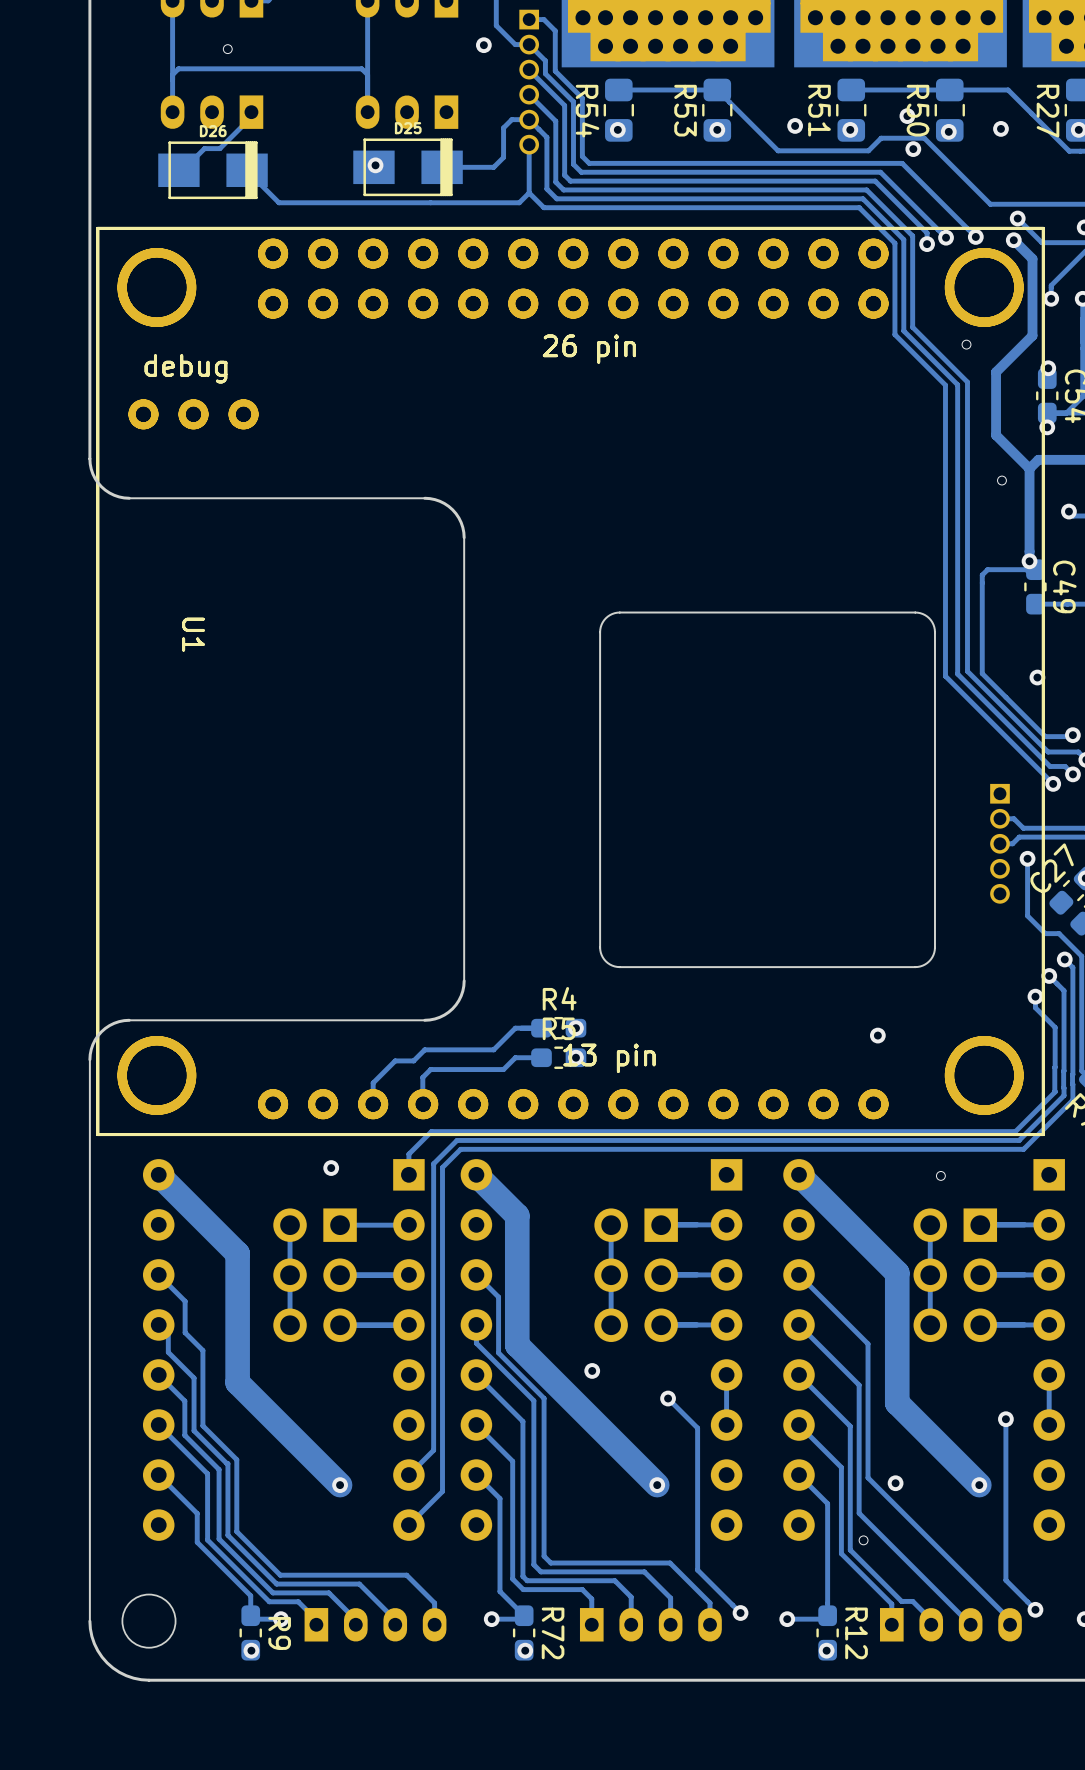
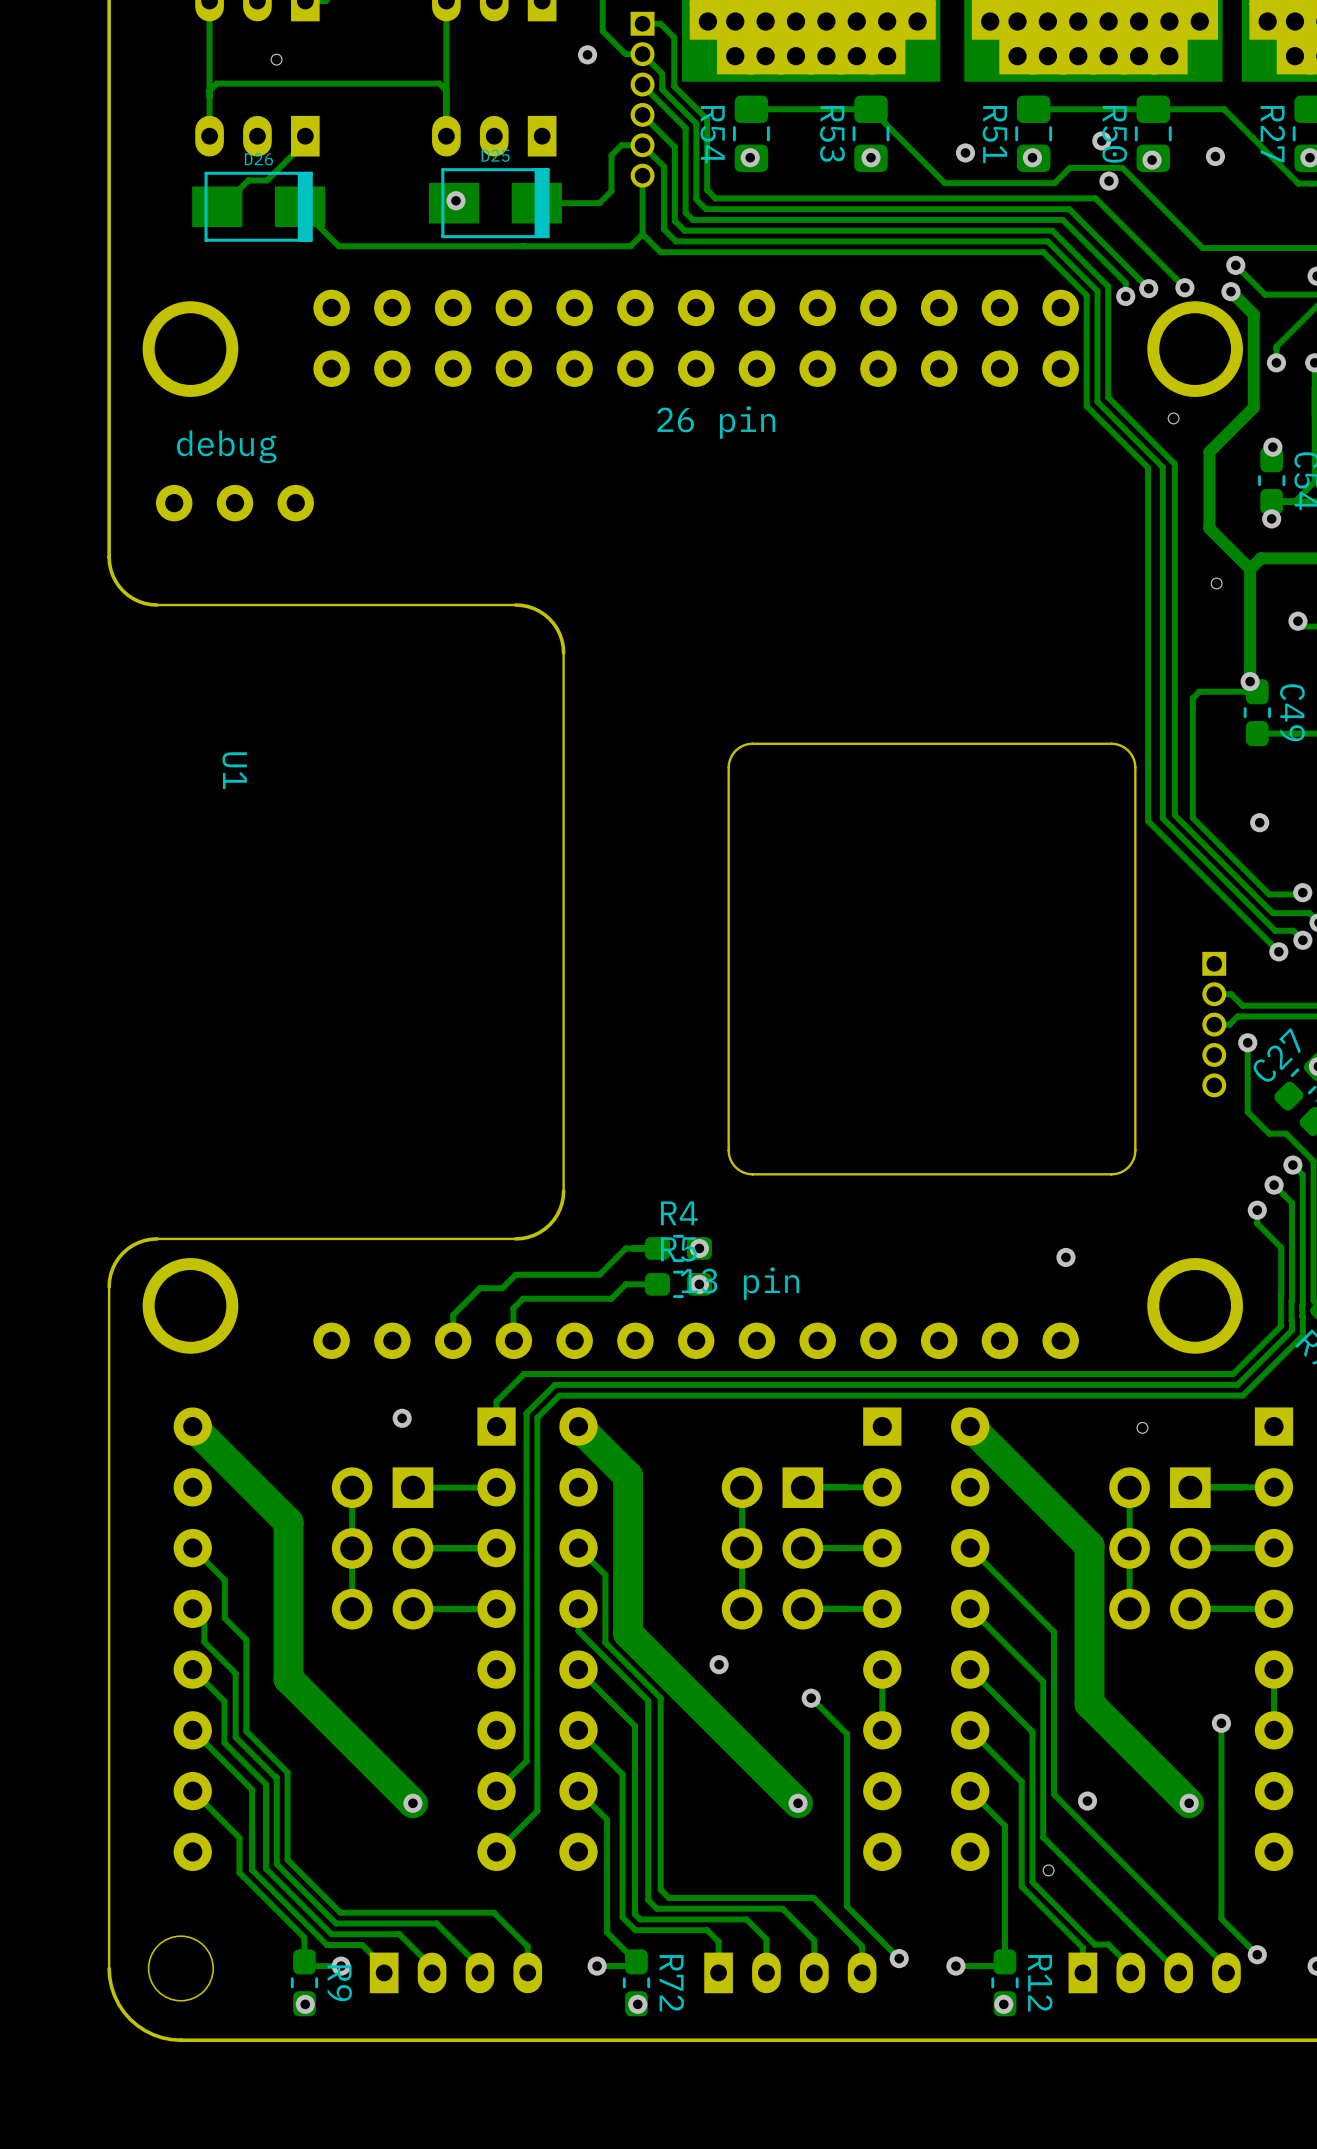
U1: none -> (692, 824)
U1: (570, 681) -> none
U1: (570, 681) -> none

